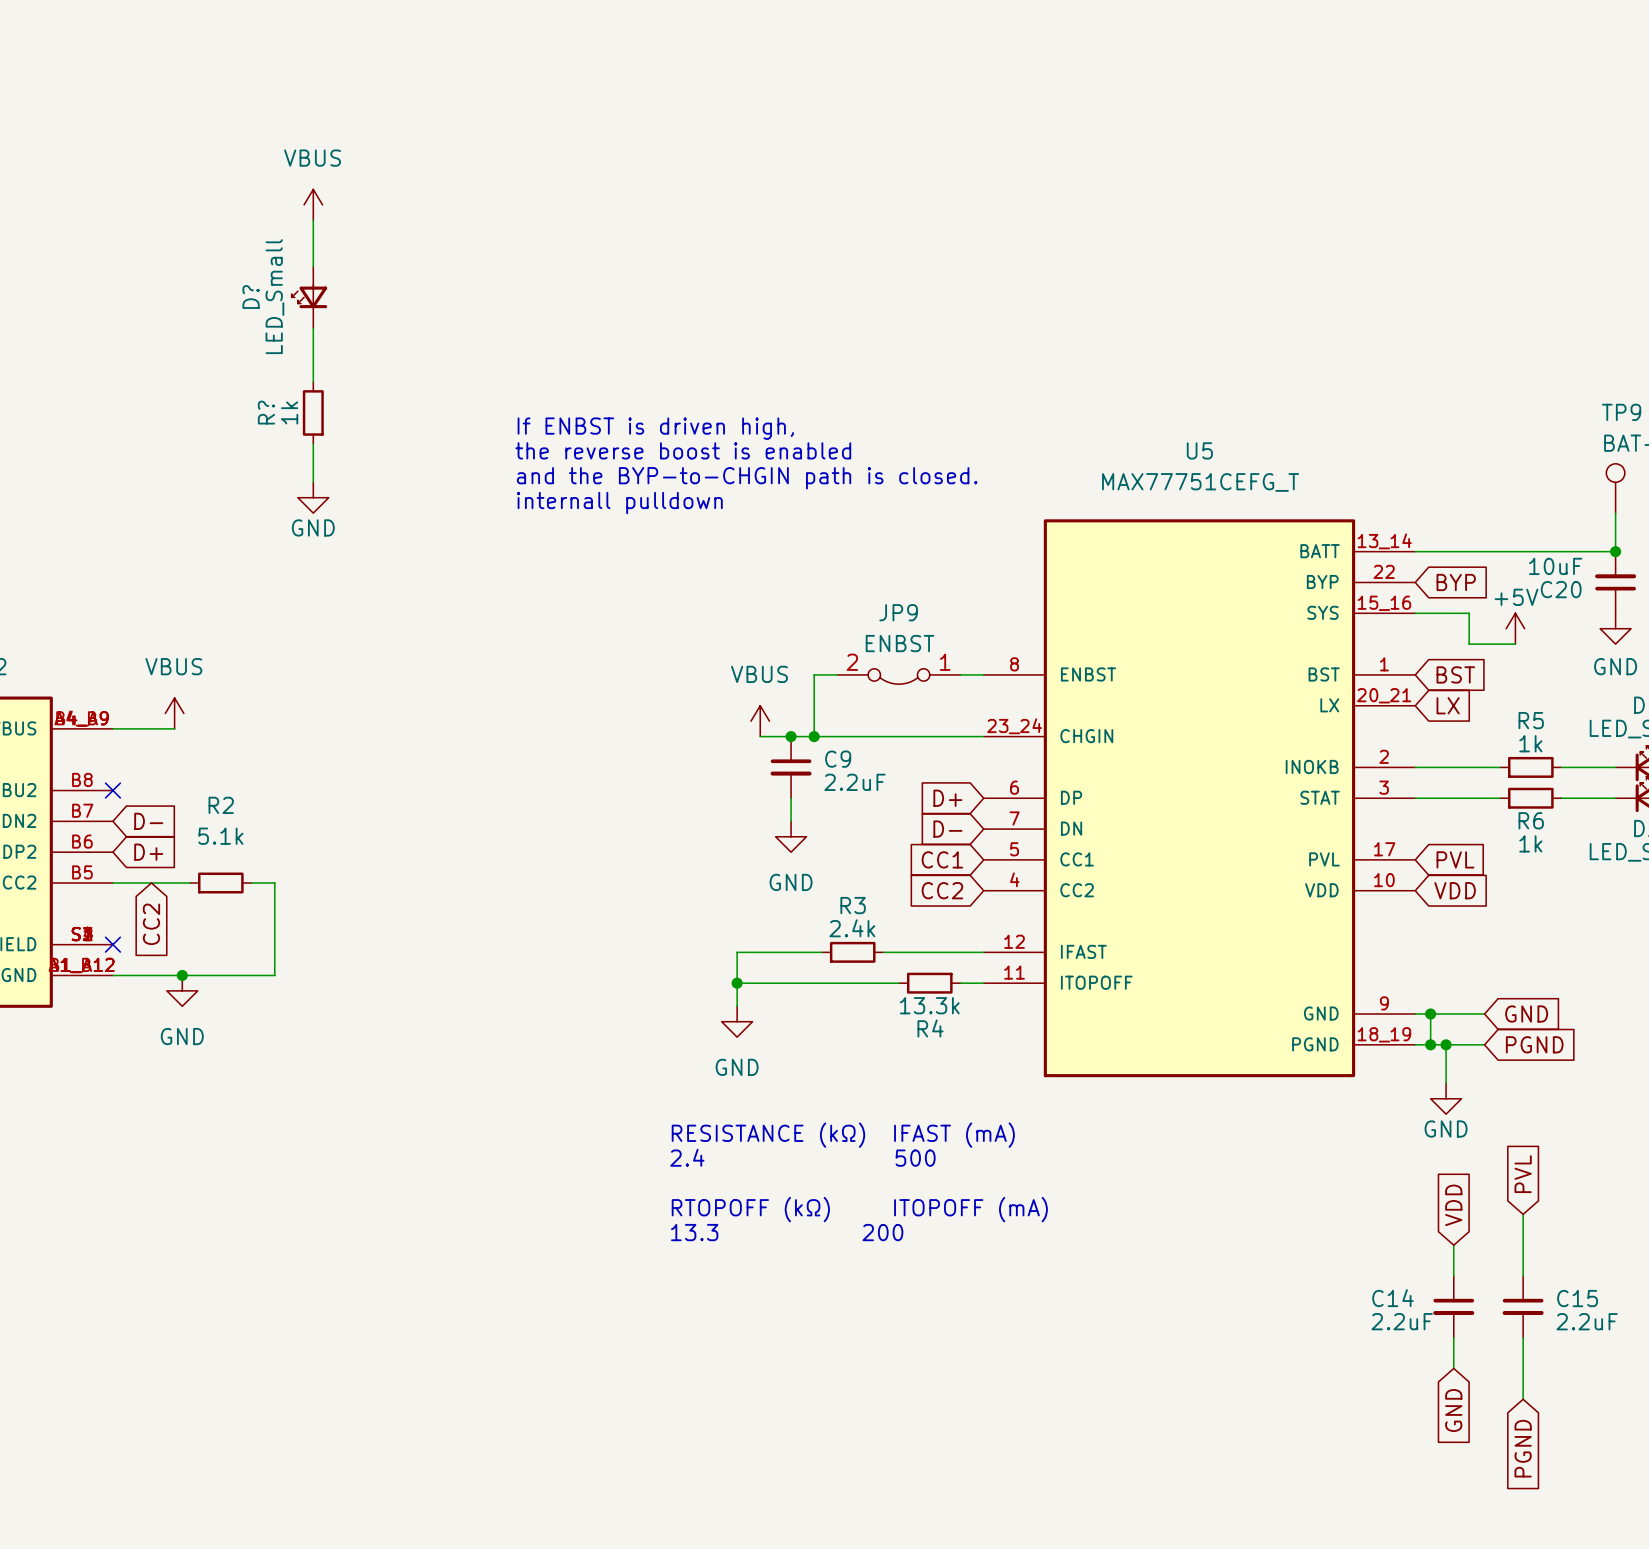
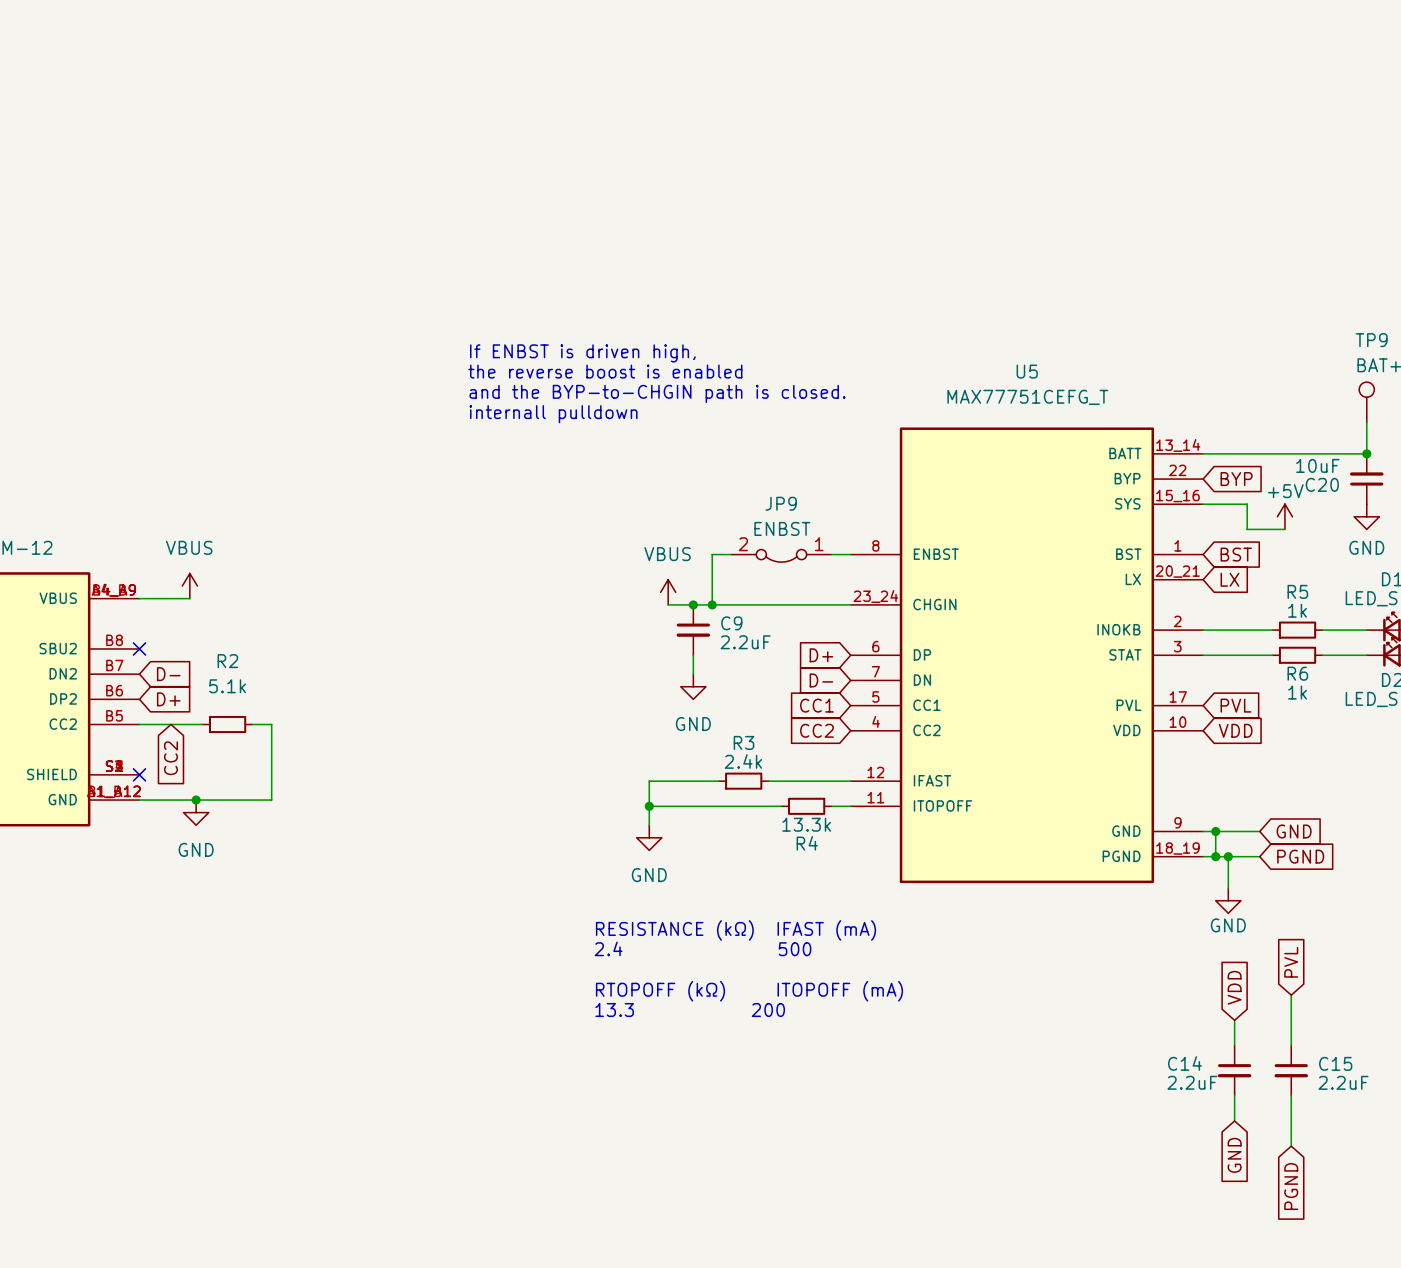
power symbol: VBUS (313, 204) -> none
wire: (313, 220) (313, 266) -> none
D?: LED_Small (309, 297) -> none
wire: (313, 328) (313, 382) -> none
R?: 1k (313, 412) -> none
wire: (313, 443) (313, 482) -> none
power symbol: GND (313, 497) -> none

